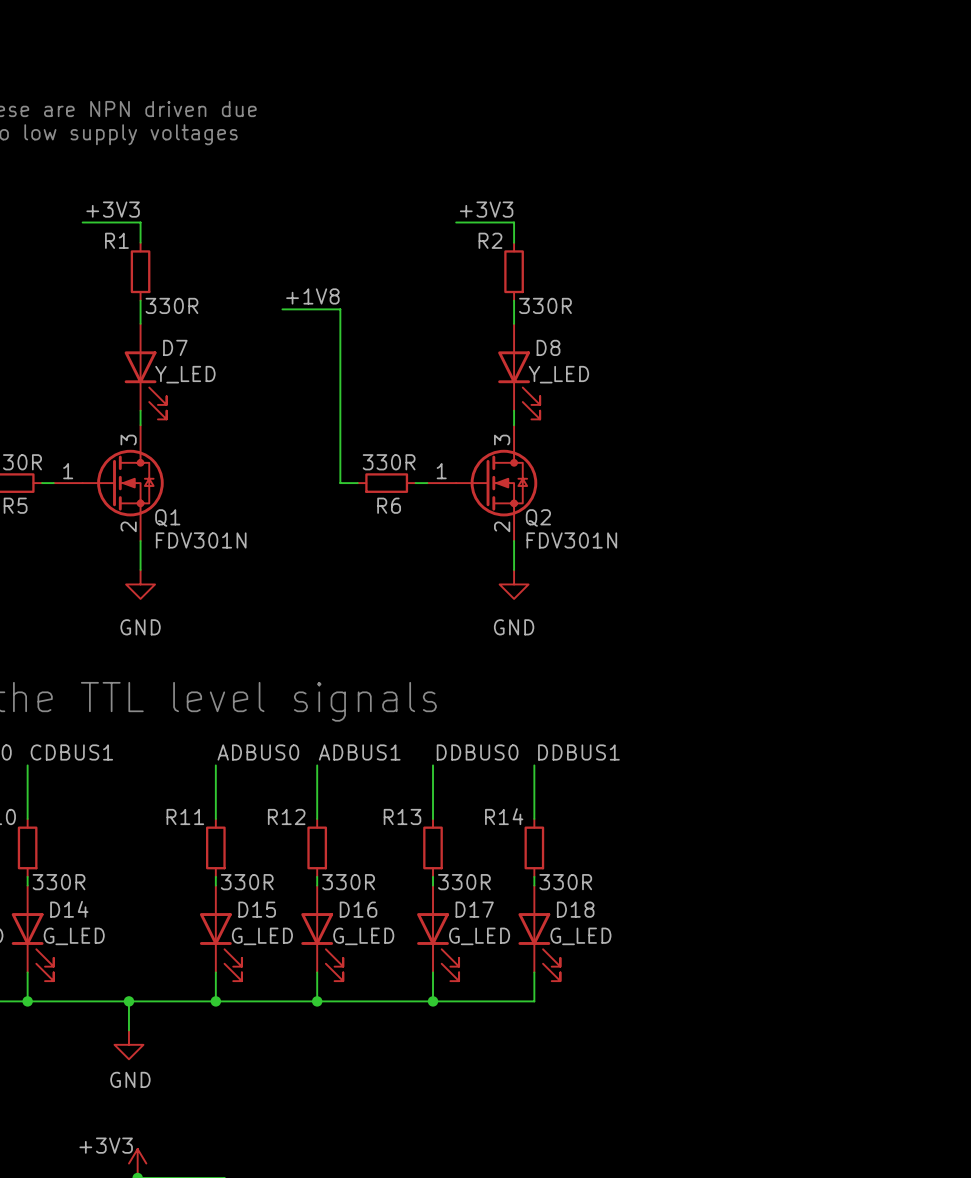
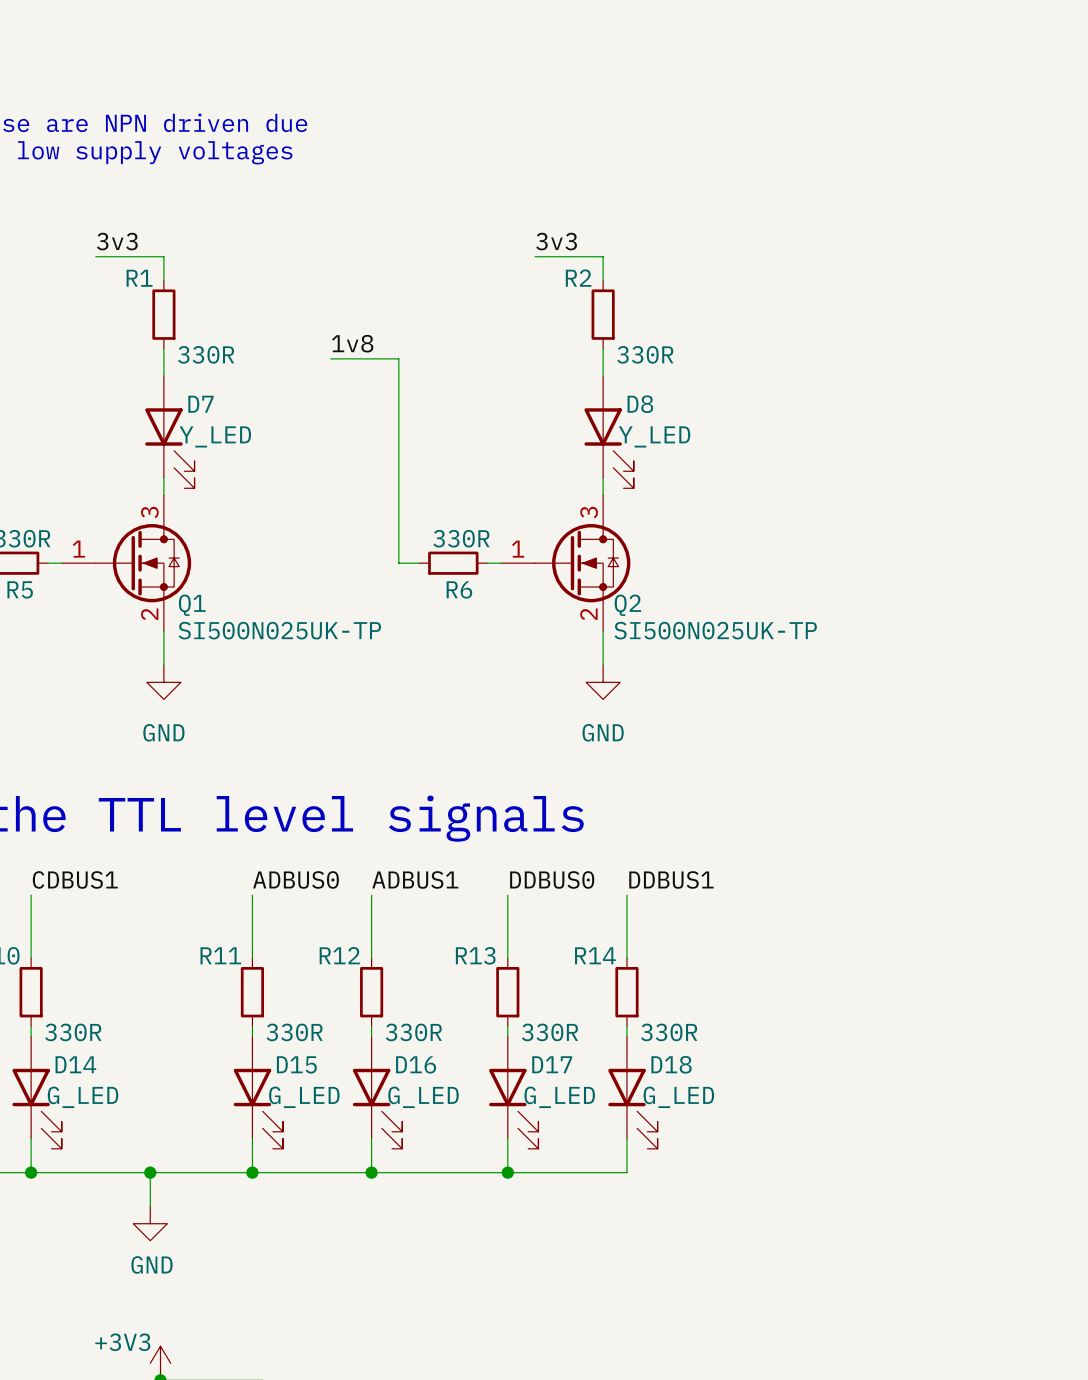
label: +3V3 (113, 209) -> 3v3 (117, 241)
label: +3V3 (486, 209) -> 3v3 (556, 241)
label: +1V8 (312, 296) -> 1v8 (352, 343)
Q1 value: FDV301N (201, 540) -> SI500N025UK-TP (279, 630)
Q2 value: FDV301N (571, 540) -> SI500N025UK-TP (715, 630)

